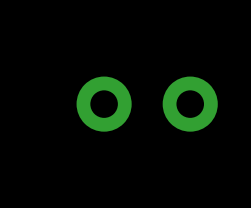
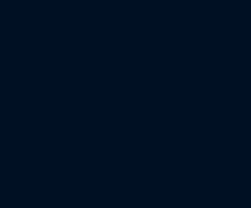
part: (147, 104) -> none

